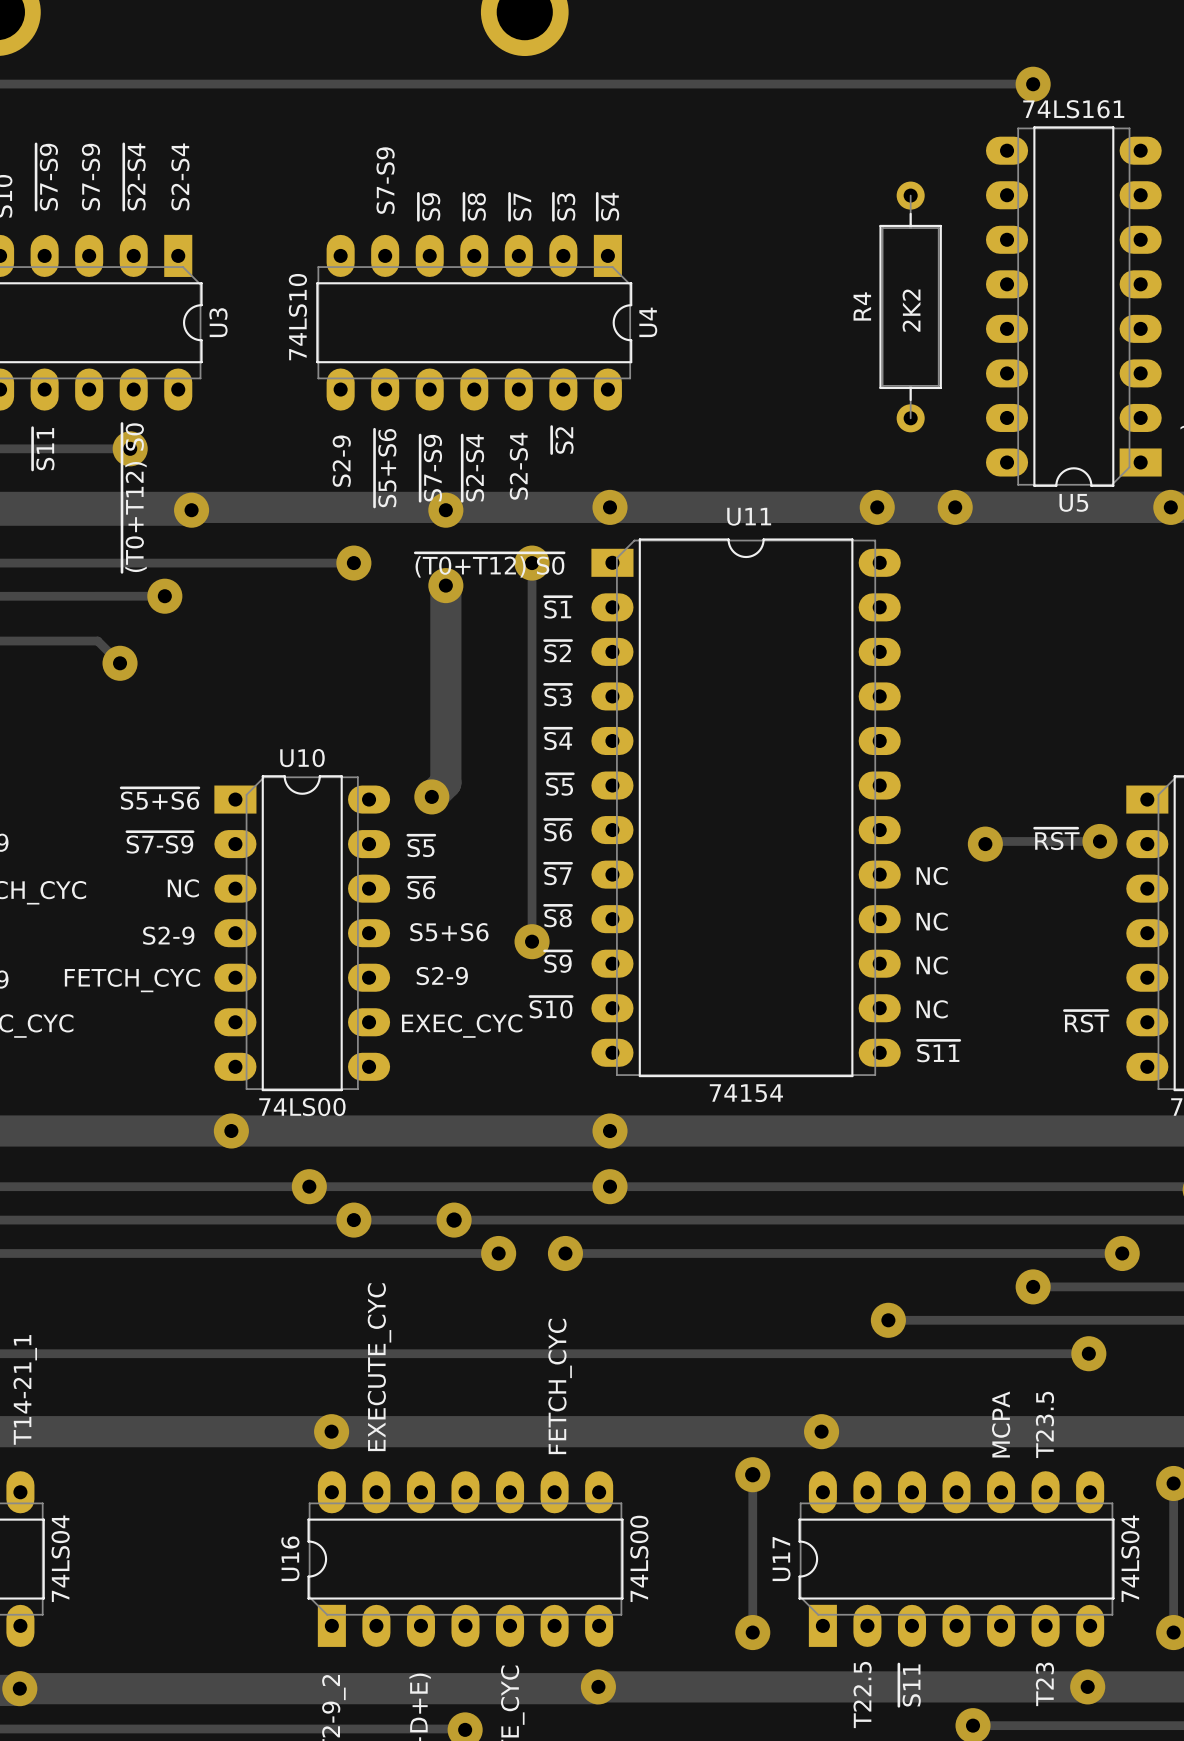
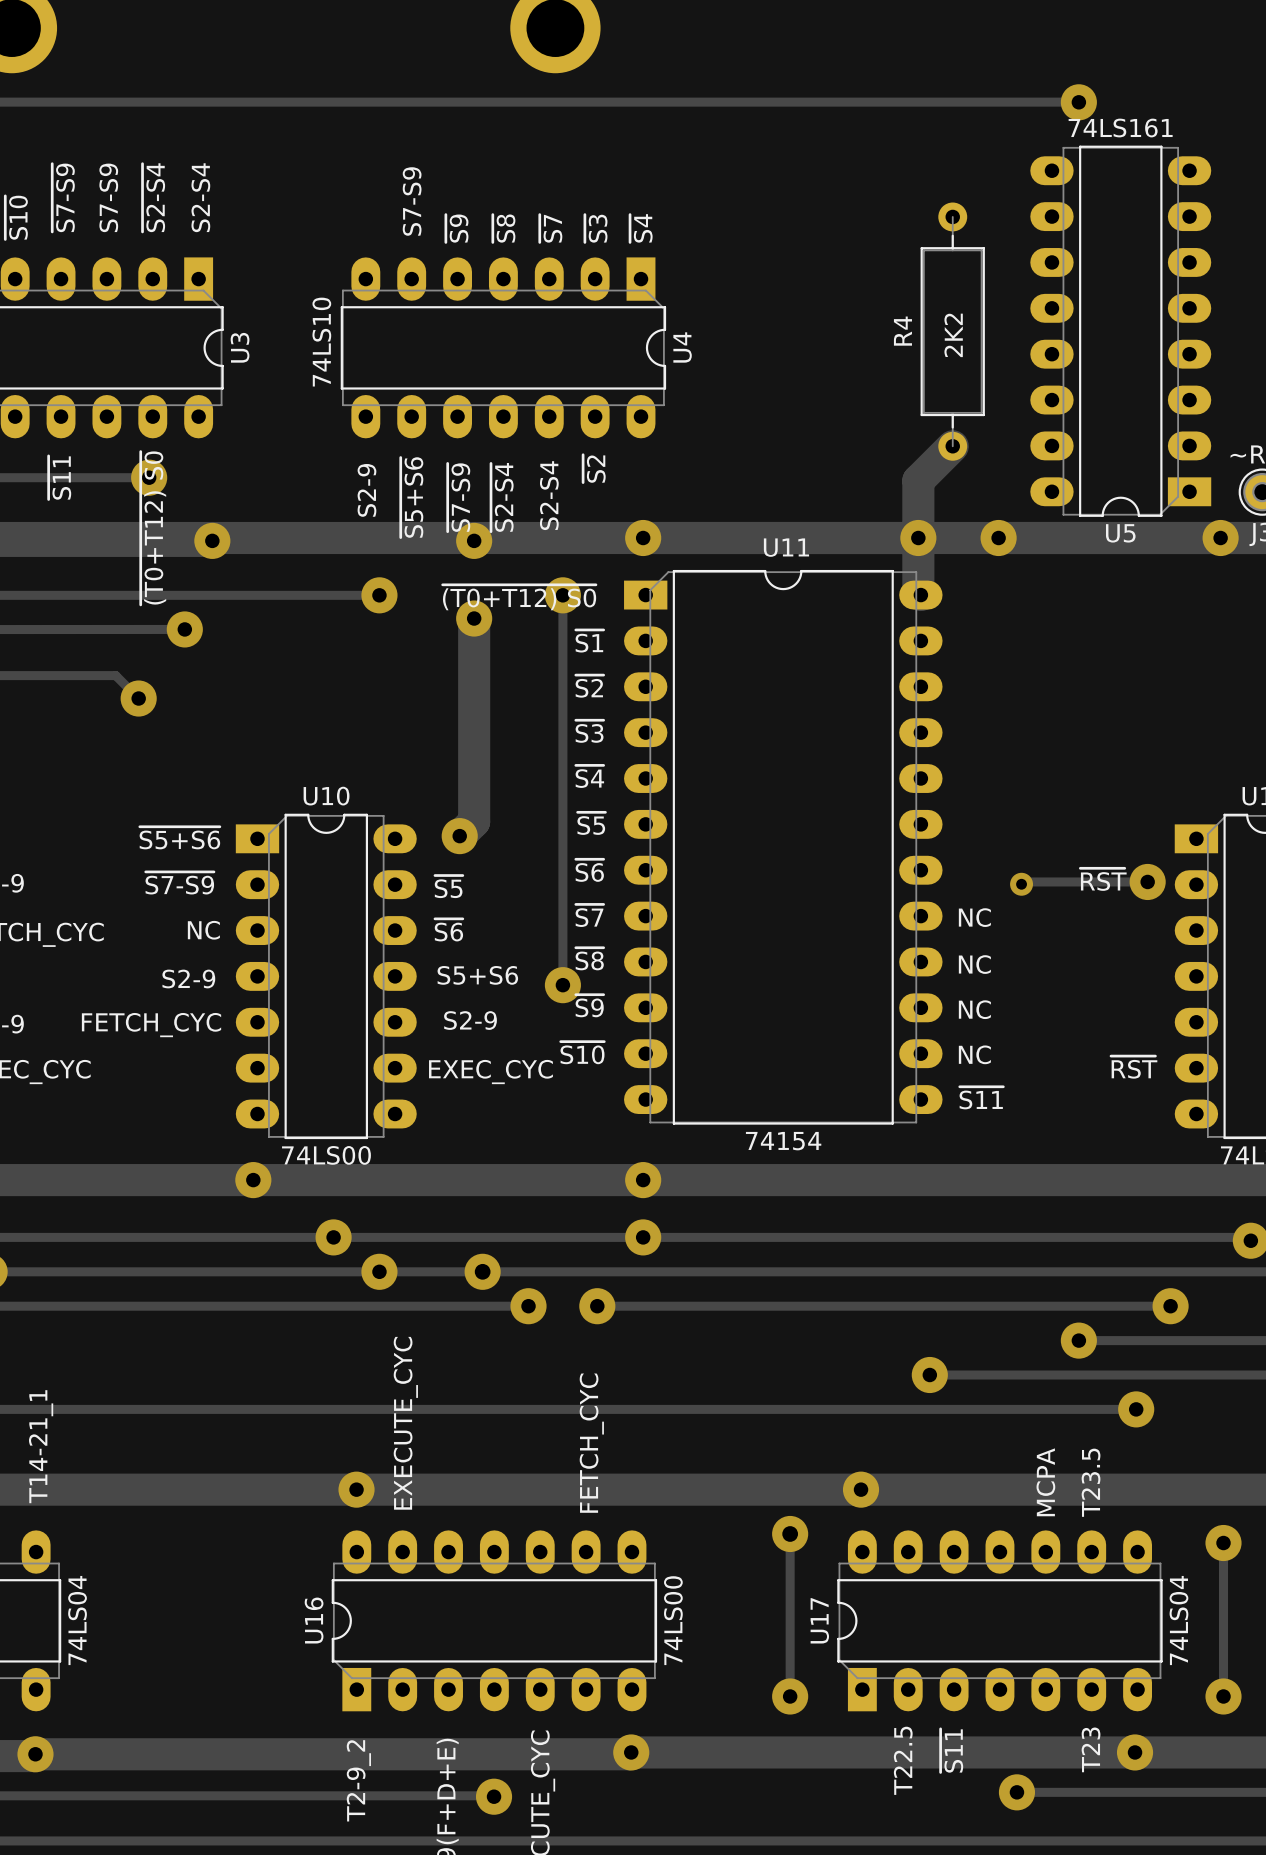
track: none -> (952, 446) (918, 480) (918, 592) (920, 595)
via size: [967, 826, 1003, 862] -> [1010, 872, 1034, 896]

